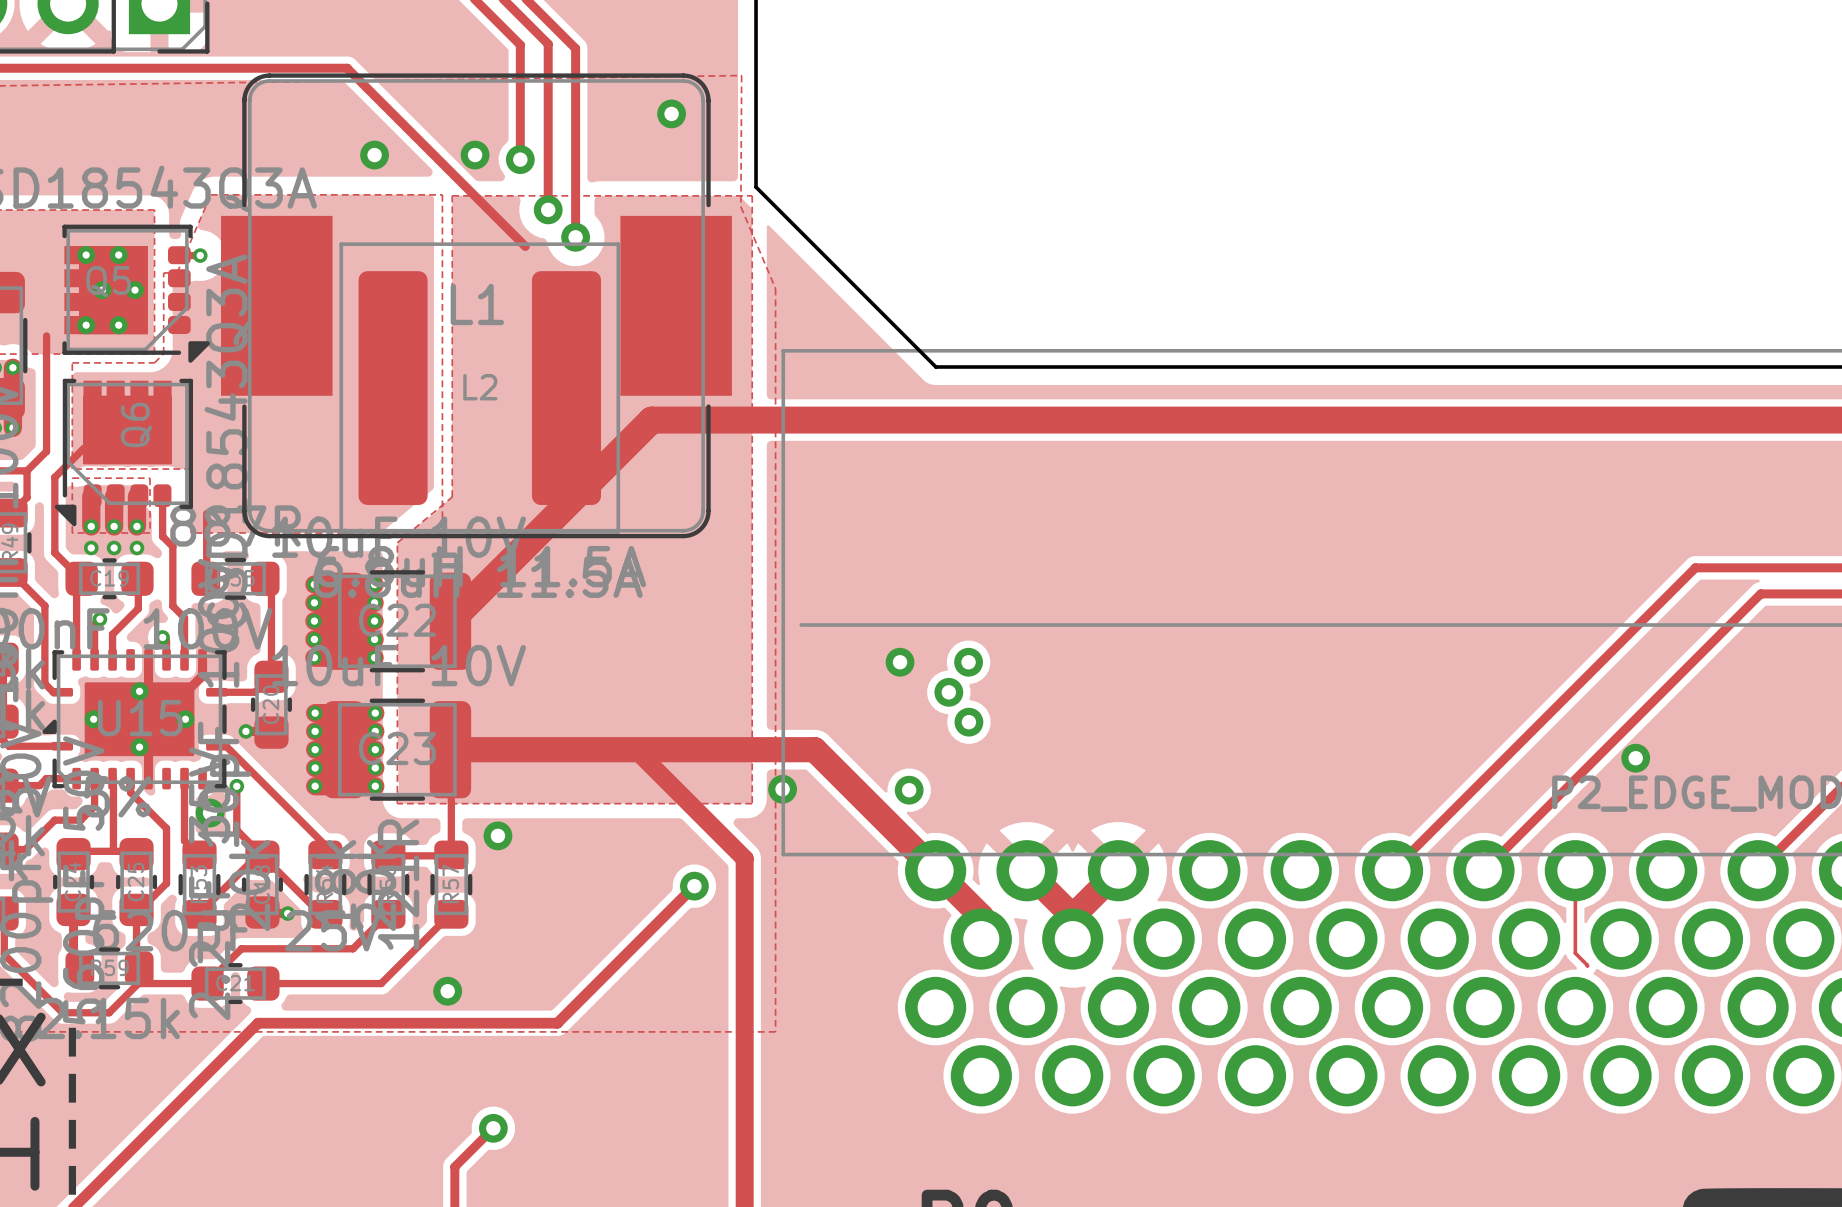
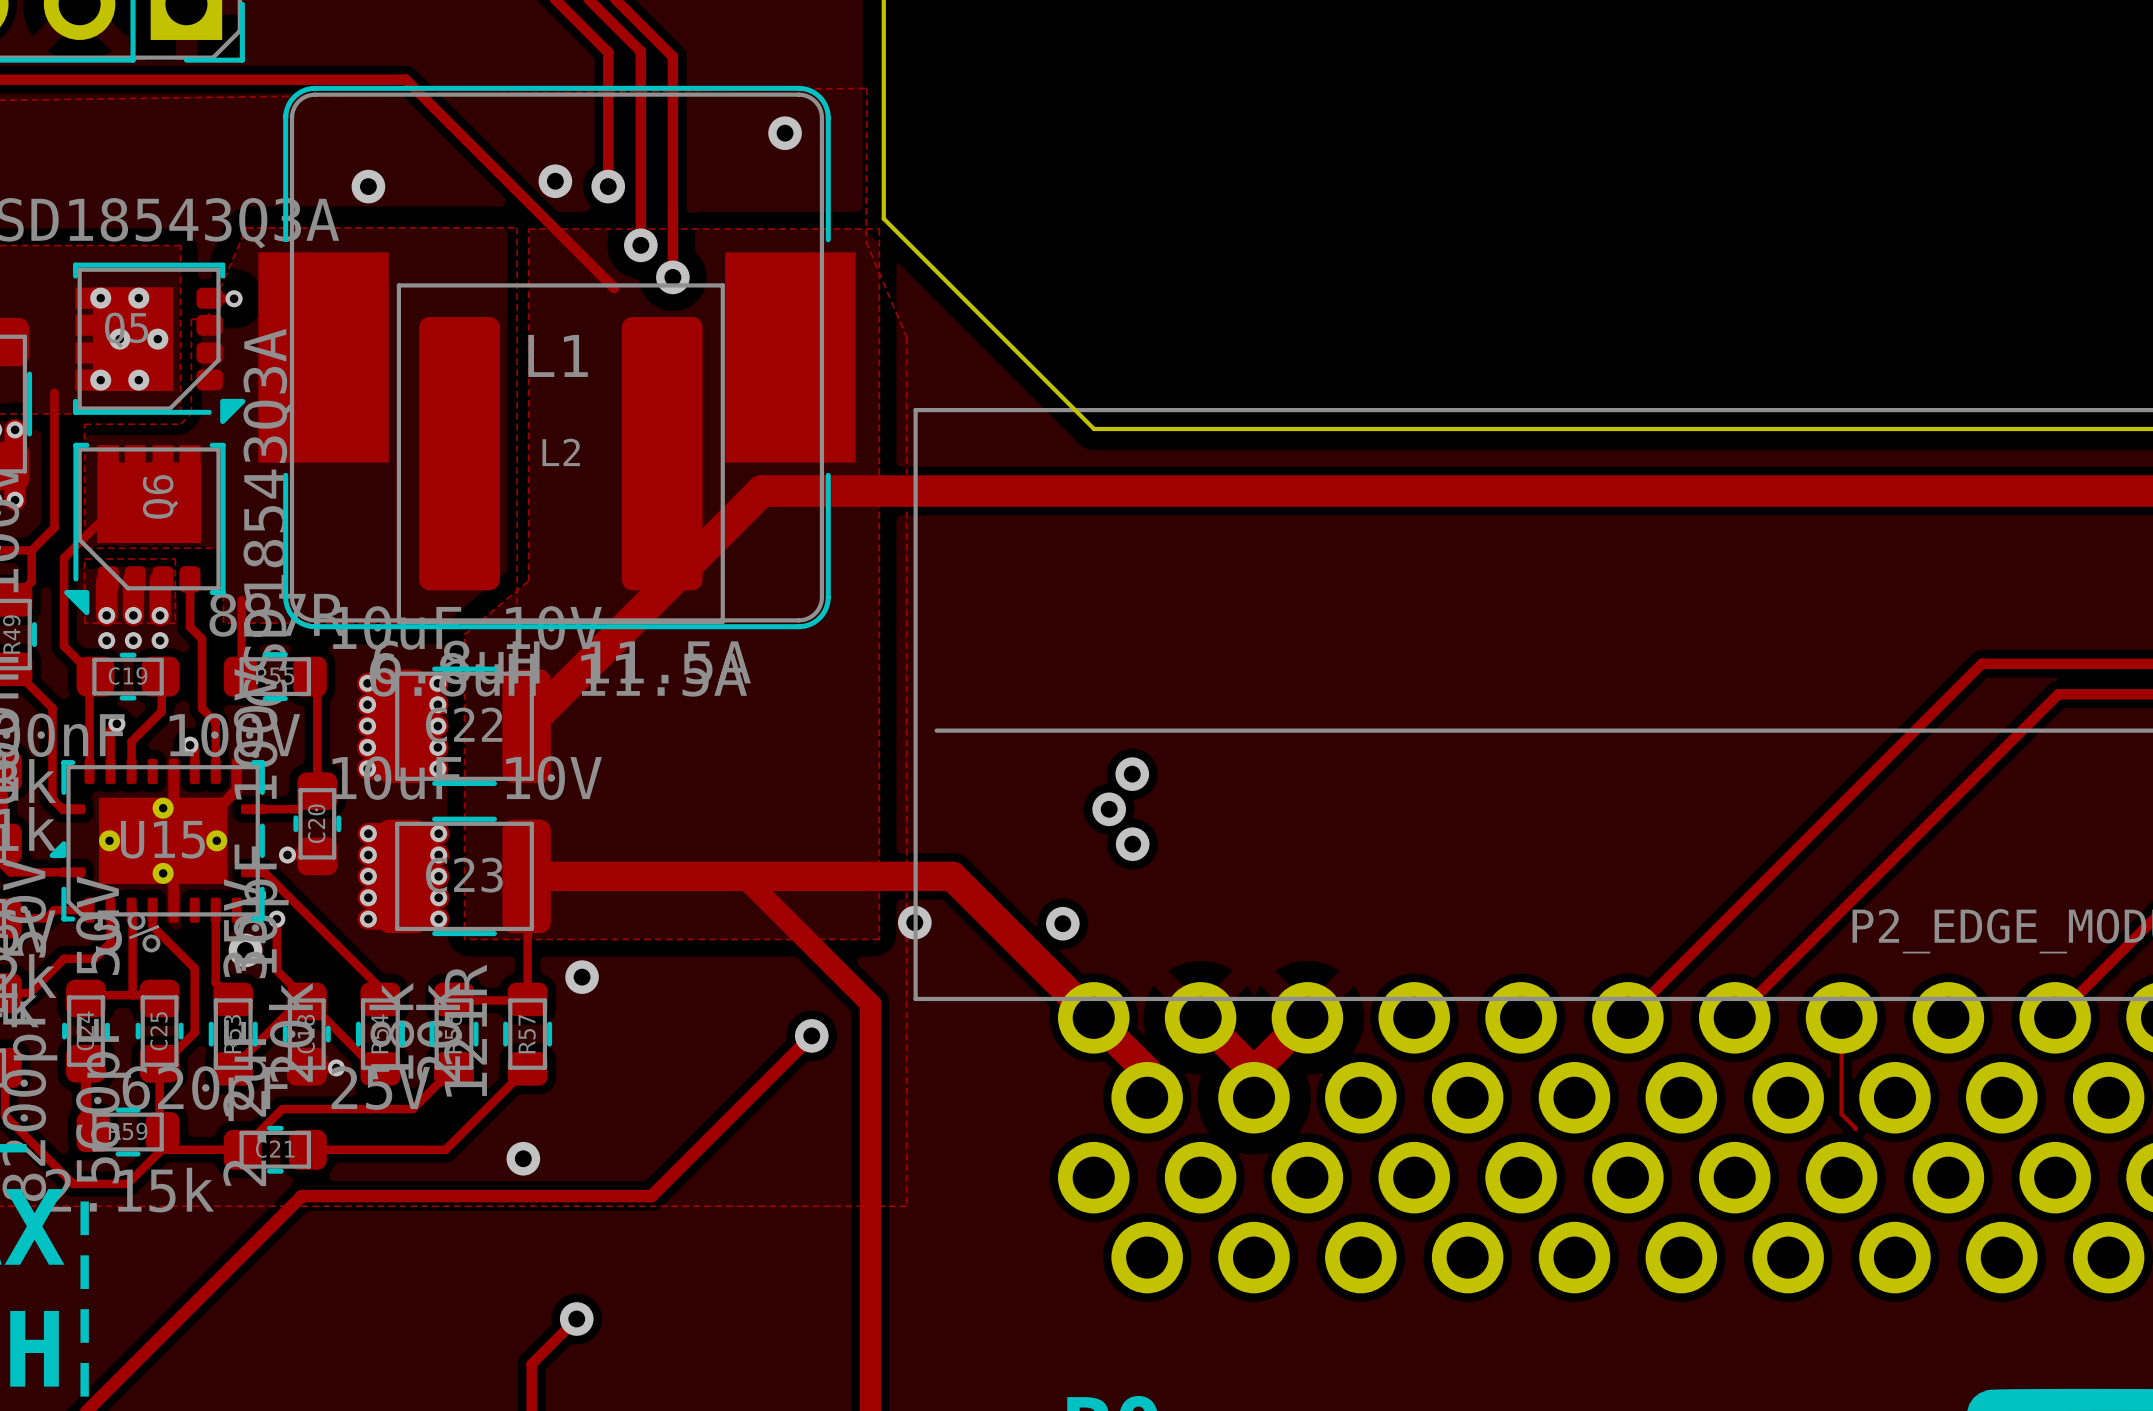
via position: (374, 155) -> (368, 186)
via: (900, 662) -> none
via: (1635, 758) -> none

